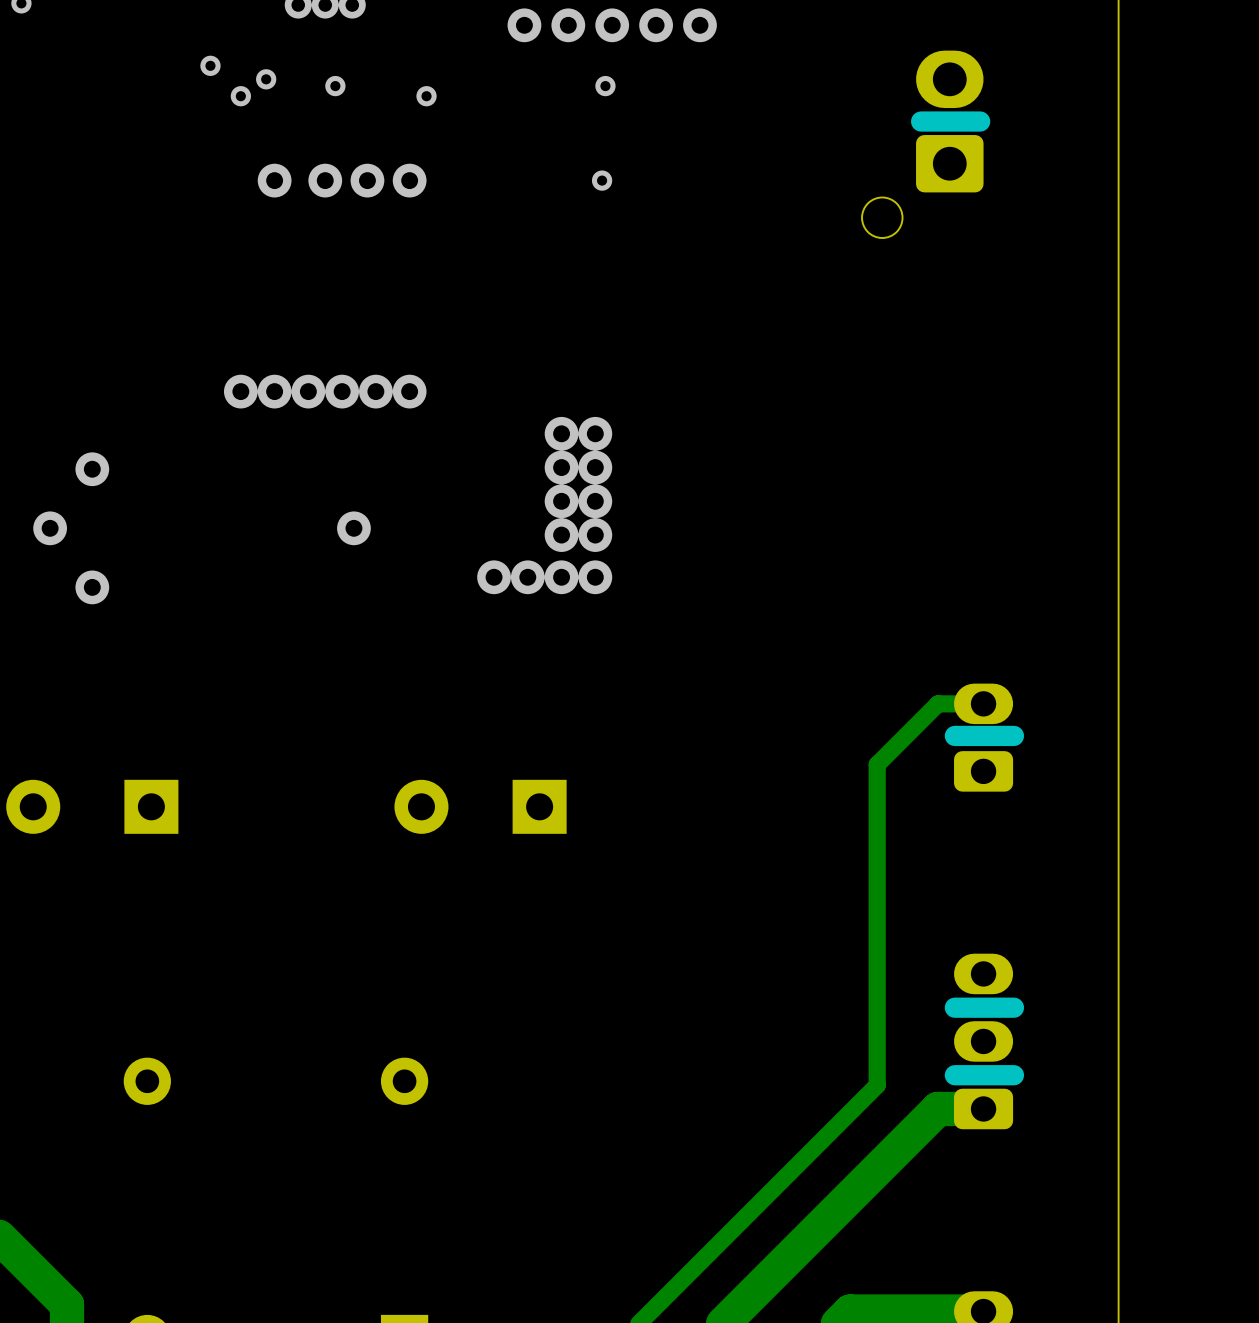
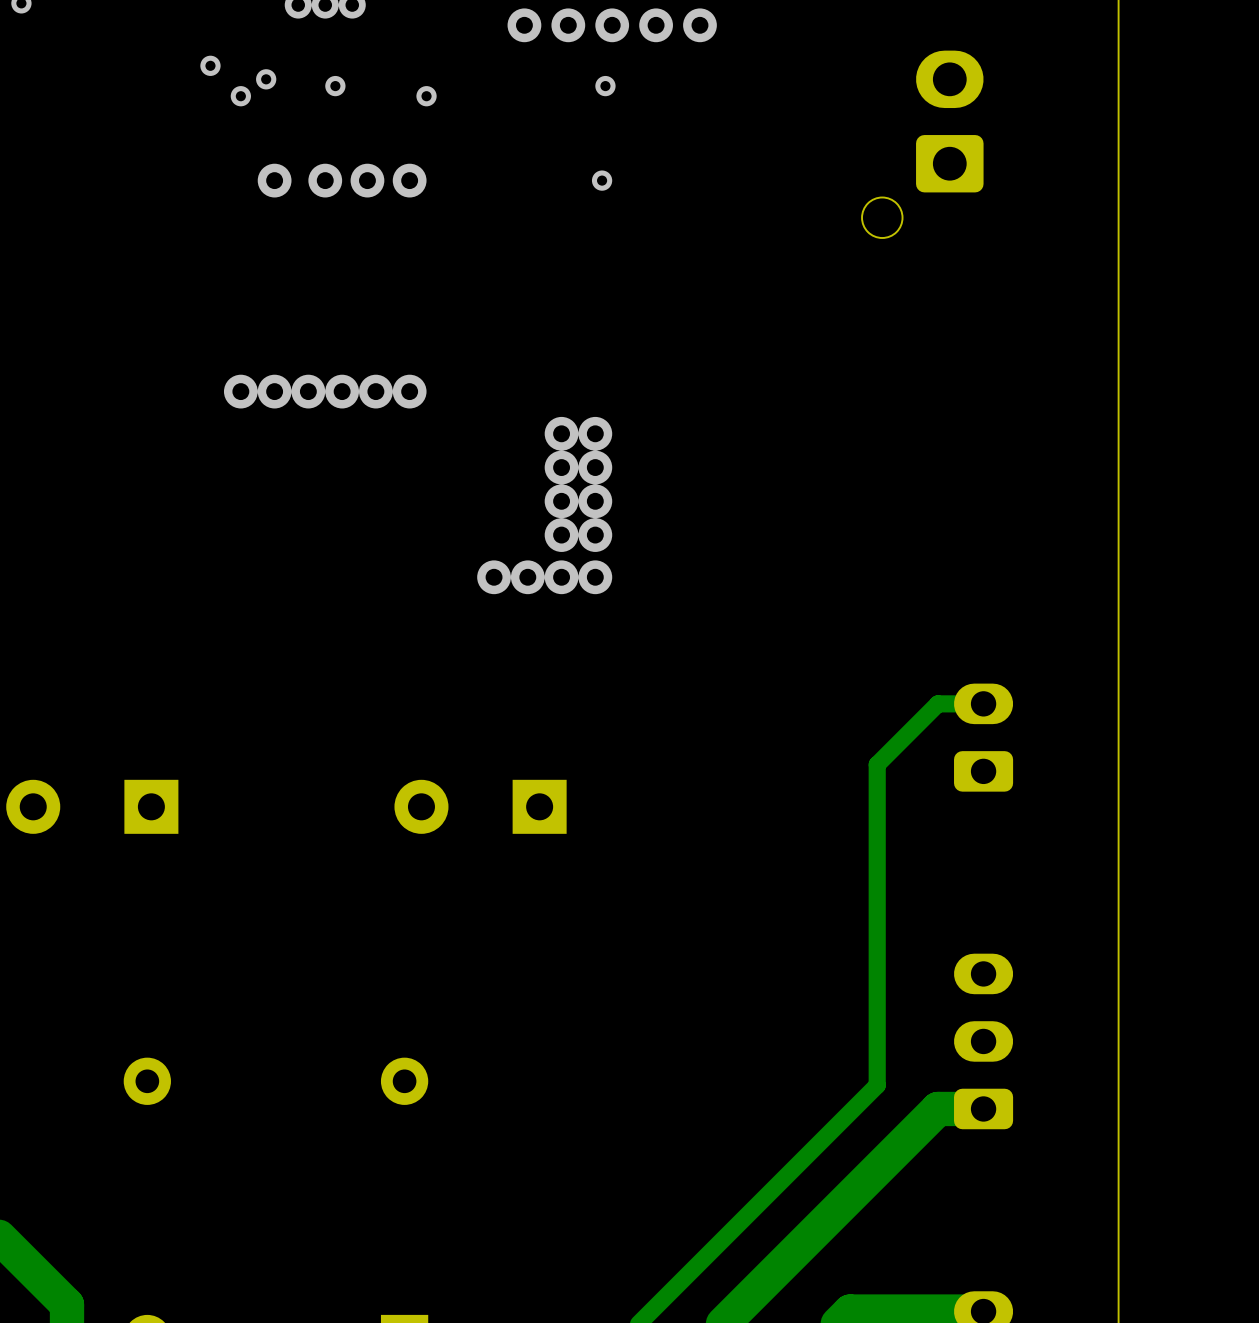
line: (980, 121) (921, 121) -> none
via: (92, 469) -> none
via: (50, 528) -> none
via: (353, 528) -> none
via: (92, 587) -> none
line: (1013, 735) (954, 735) -> none
line: (1013, 1007) (954, 1007) -> none
line: (1013, 1075) (954, 1075) -> none

